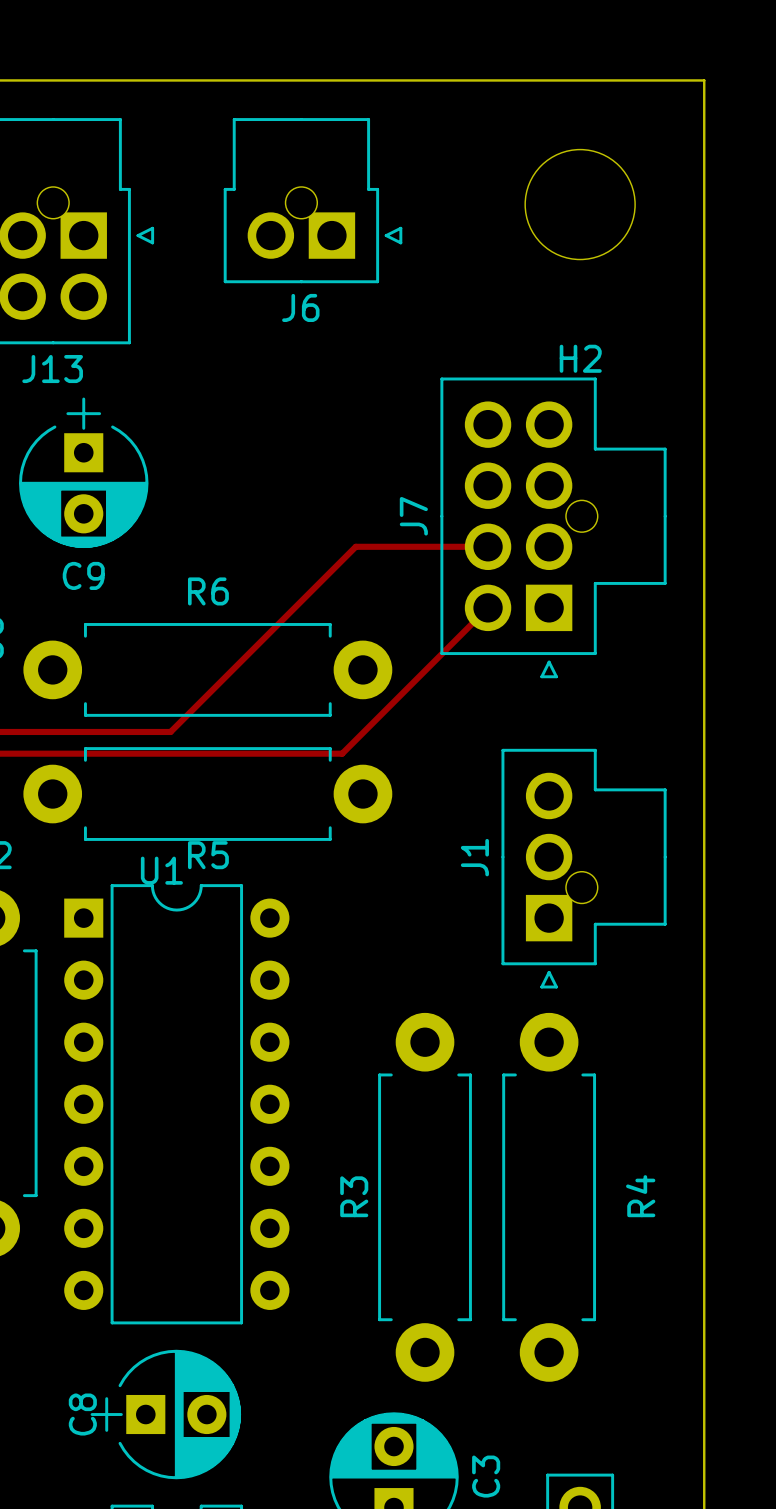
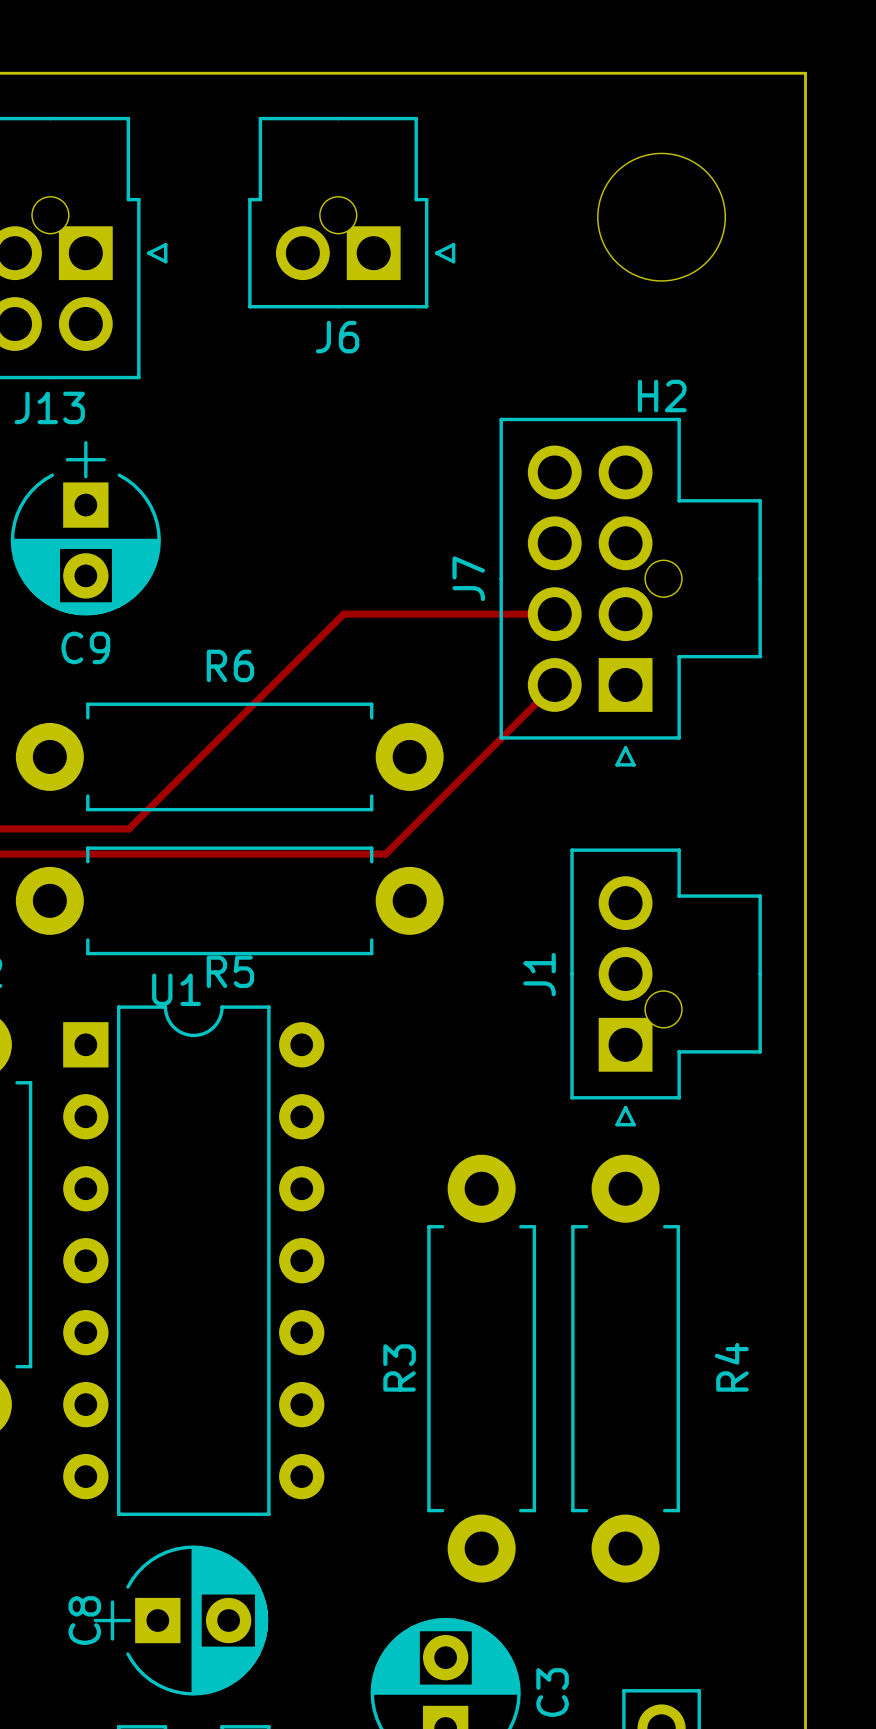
track: (355, 546) (170, 731) (120, 731) -> (401, 614) (343, 614) (129, 828)

